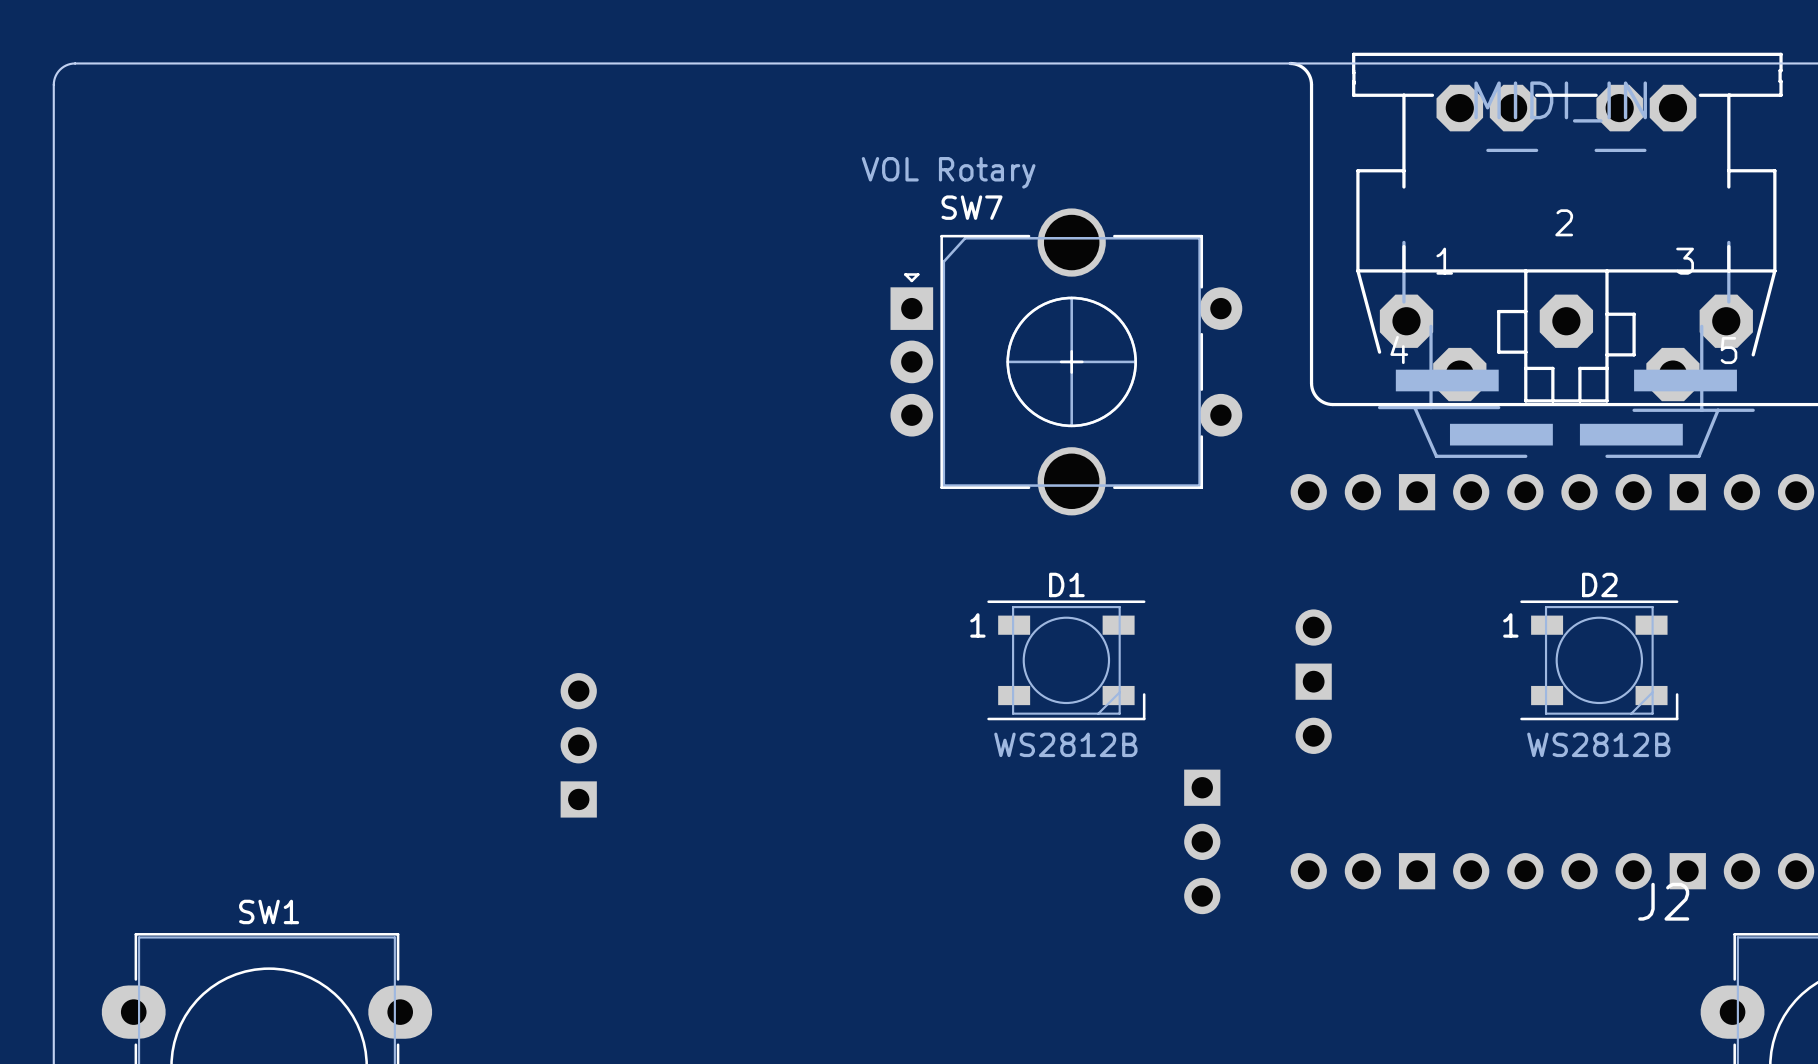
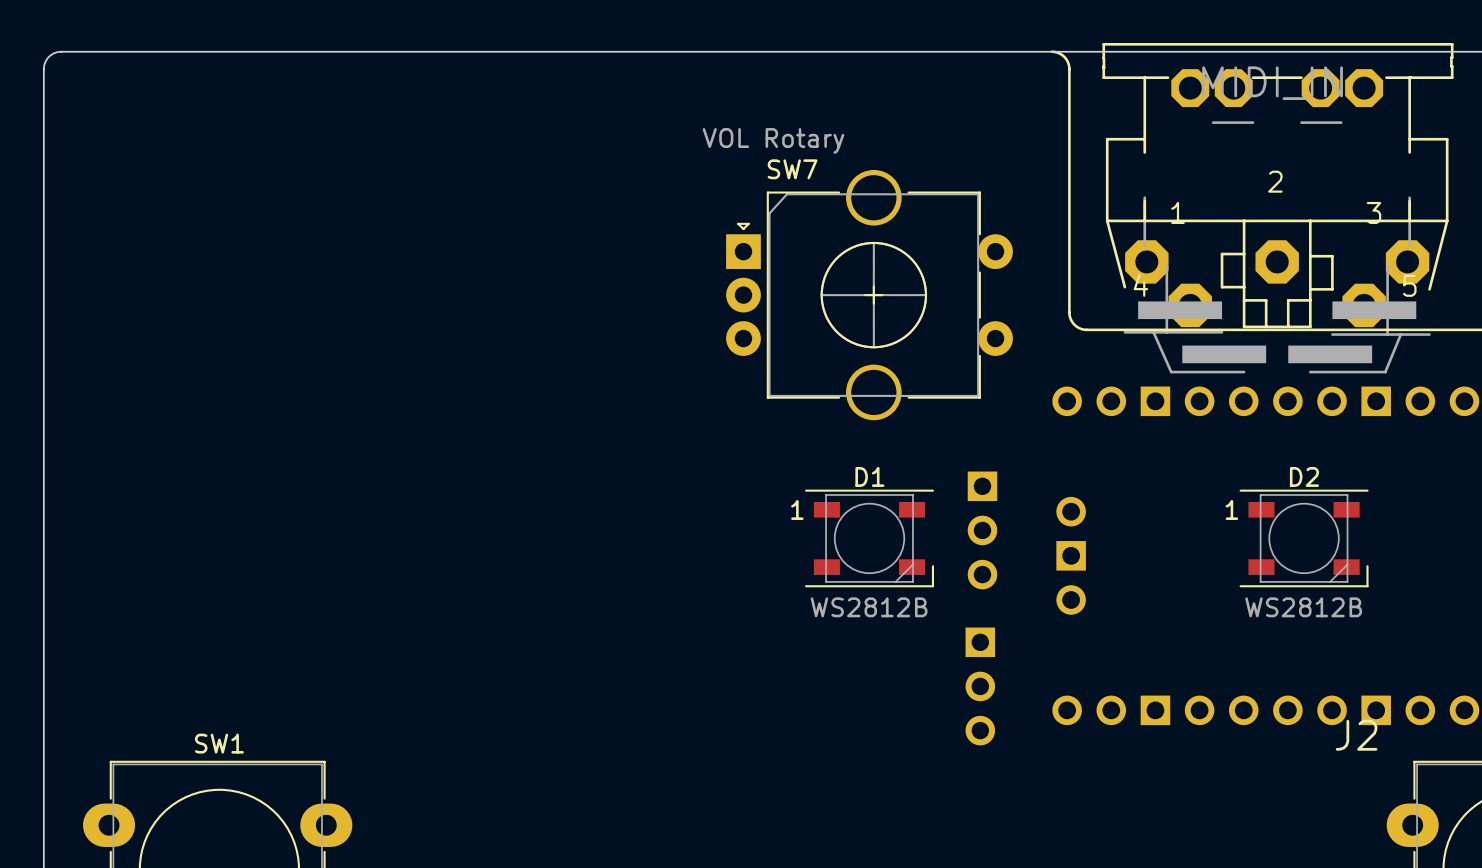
part: none -> (982, 530)
part: (578, 745) -> none

